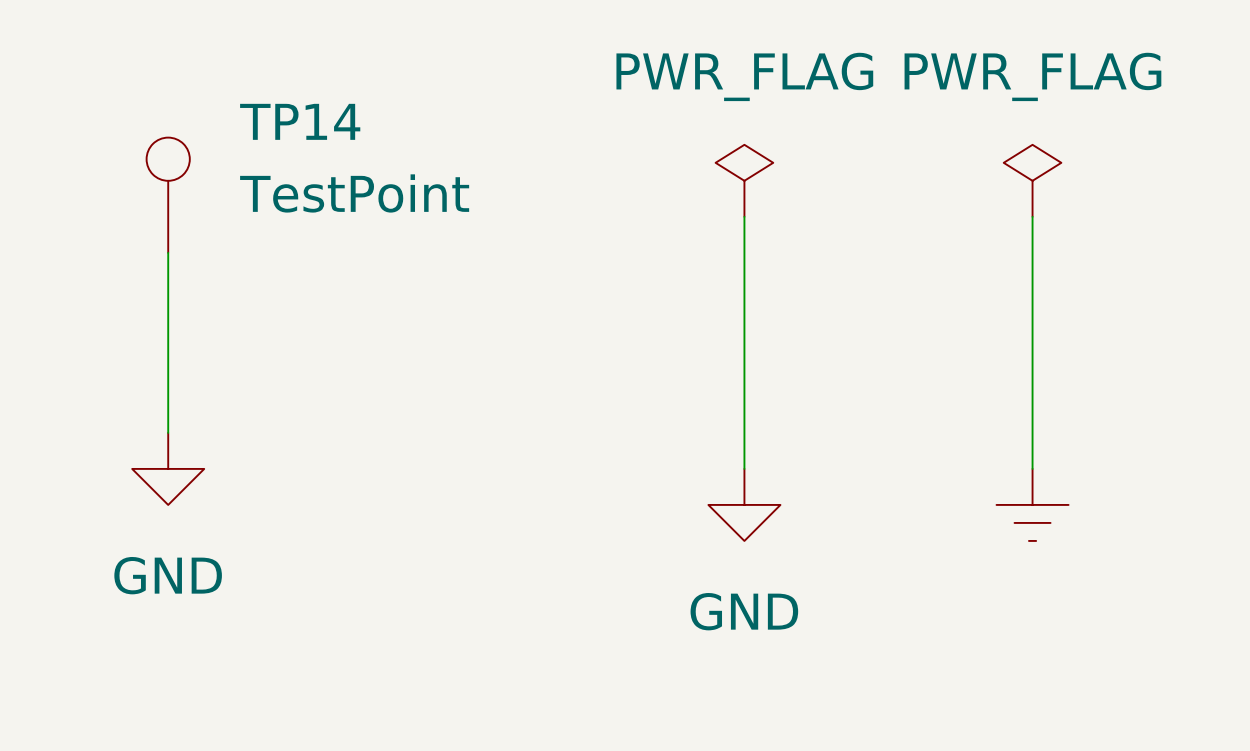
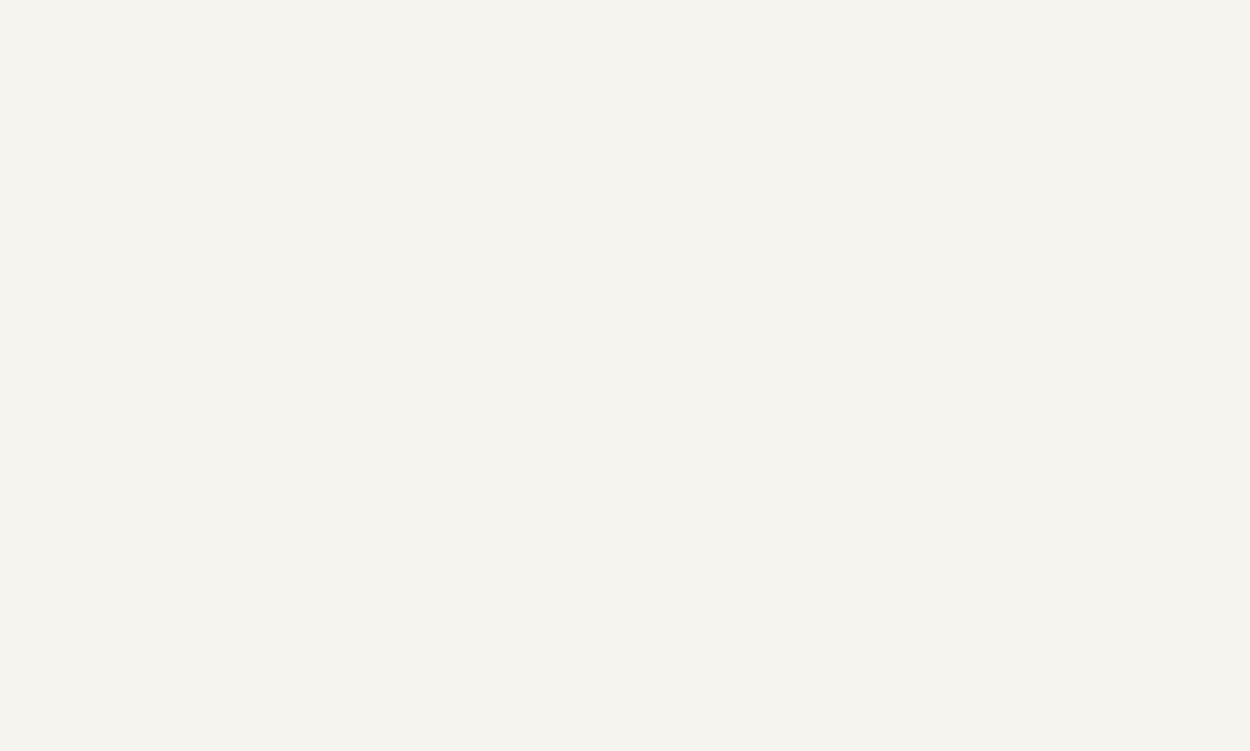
power symbol: PWR_FLAG (744, 180) -> none
power symbol: PWR_FLAG (1032, 180) -> none
TP14: TestPoint (168, 195) -> none
wire: (744, 216) (744, 468) -> none
wire: (1032, 216) (1032, 468) -> none
wire: (168, 252) (168, 432) -> none
power symbol: GND (168, 468) -> none
power symbol: GND (744, 504) -> none
power symbol: (1032, 504) -> none

